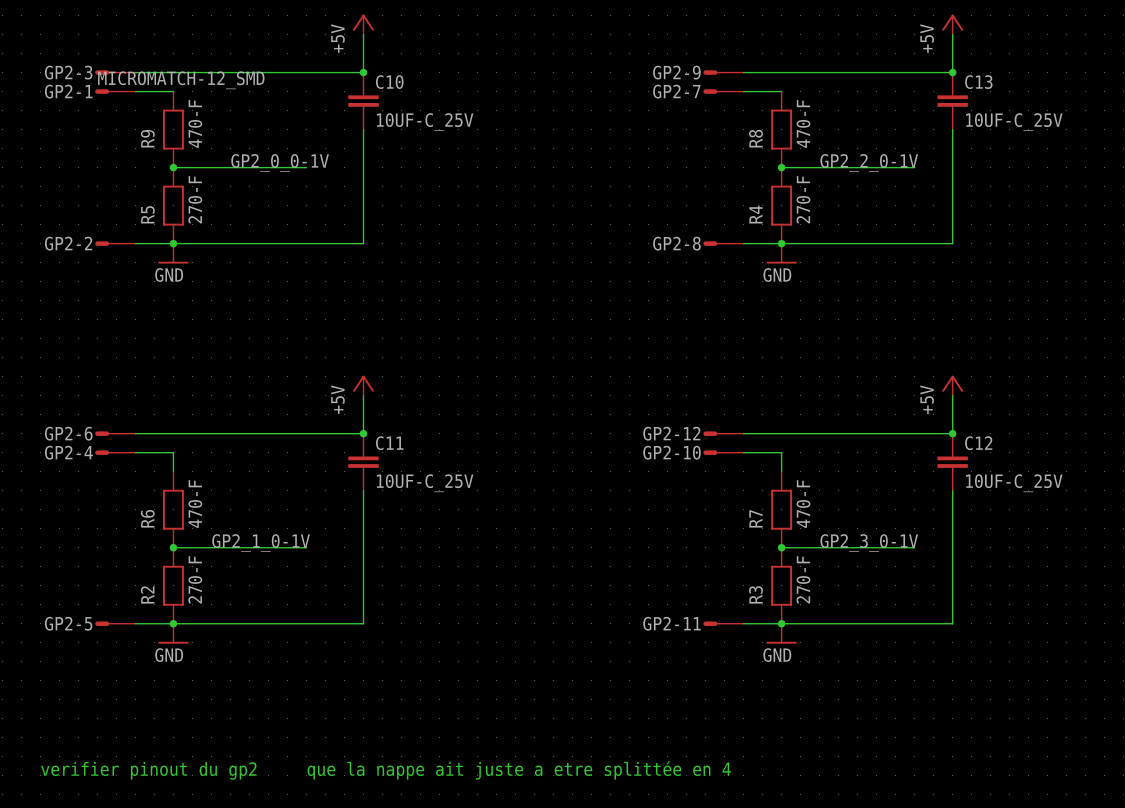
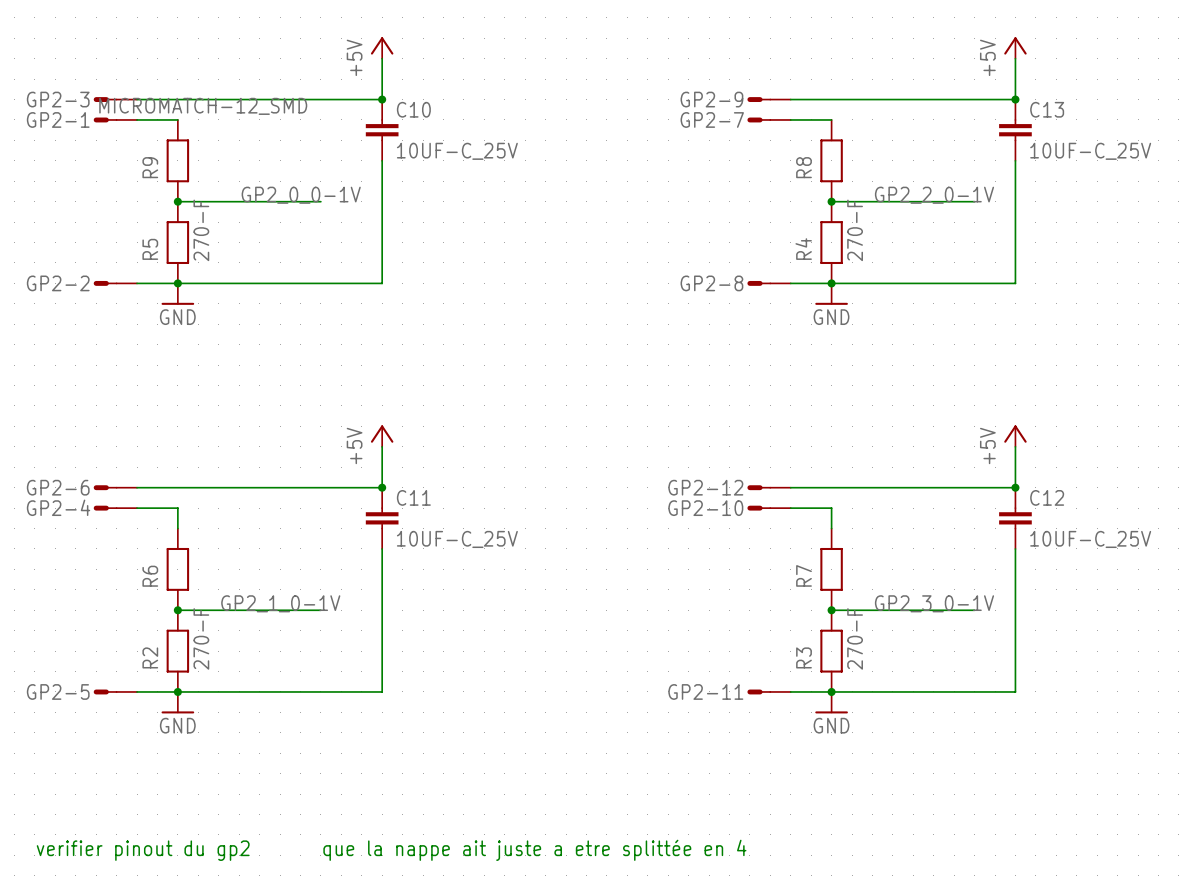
R9 value: 470-F (195, 123) -> none
R8 value: 470-F (803, 123) -> none
R6 value: 470-F (195, 504) -> none
R7 value: 470-F (803, 504) -> none

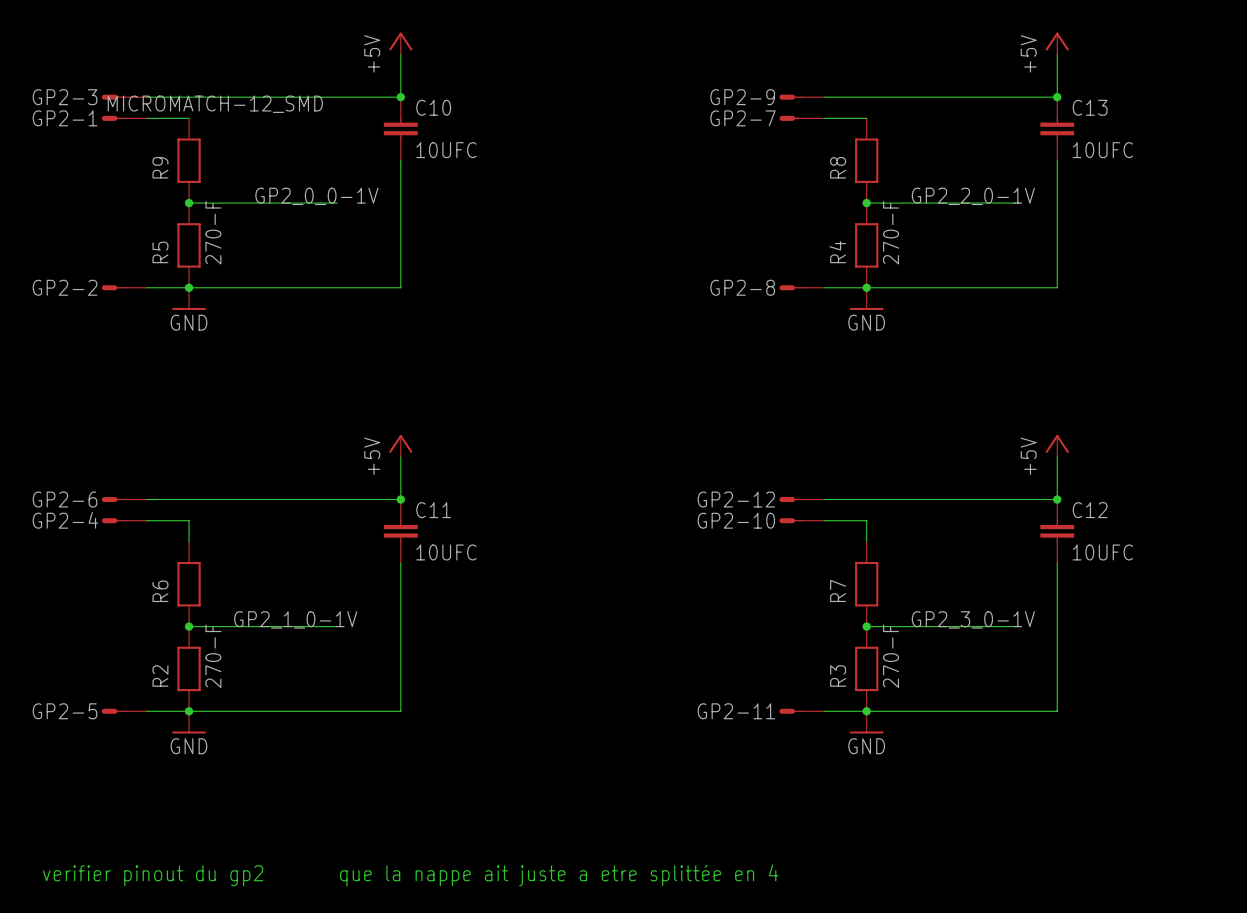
C10 value: 10UF-C_25V (457, 151) -> 10UFC (446, 150)
C13 value: 10UF-C_25V (1090, 151) -> 10UFC (1102, 150)
C11 value: 10UF-C_25V (457, 539) -> 10UFC (446, 552)
C12 value: 10UF-C_25V (1090, 539) -> 10UFC (1102, 552)

